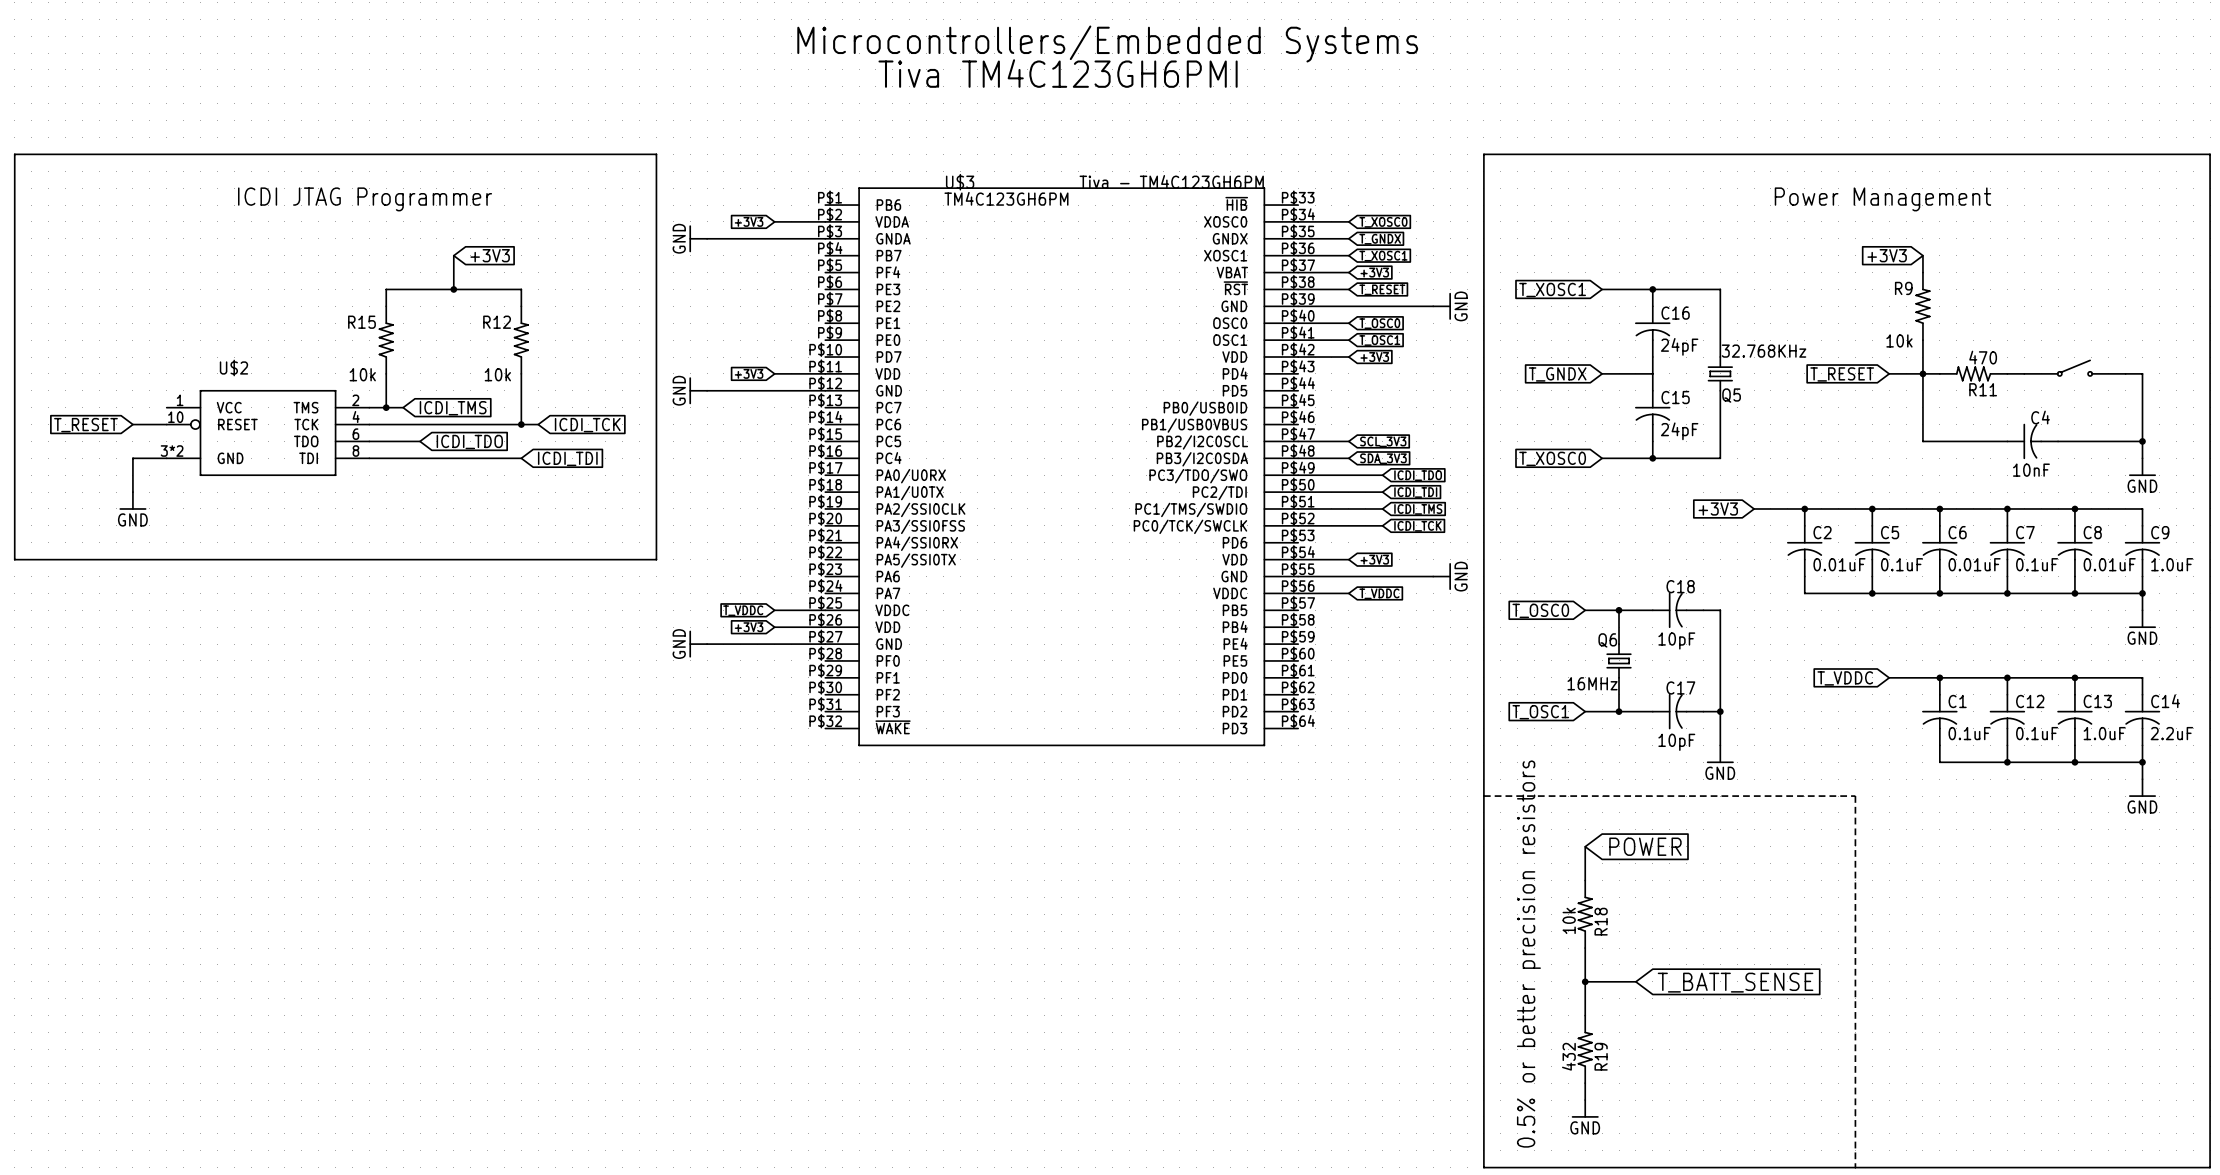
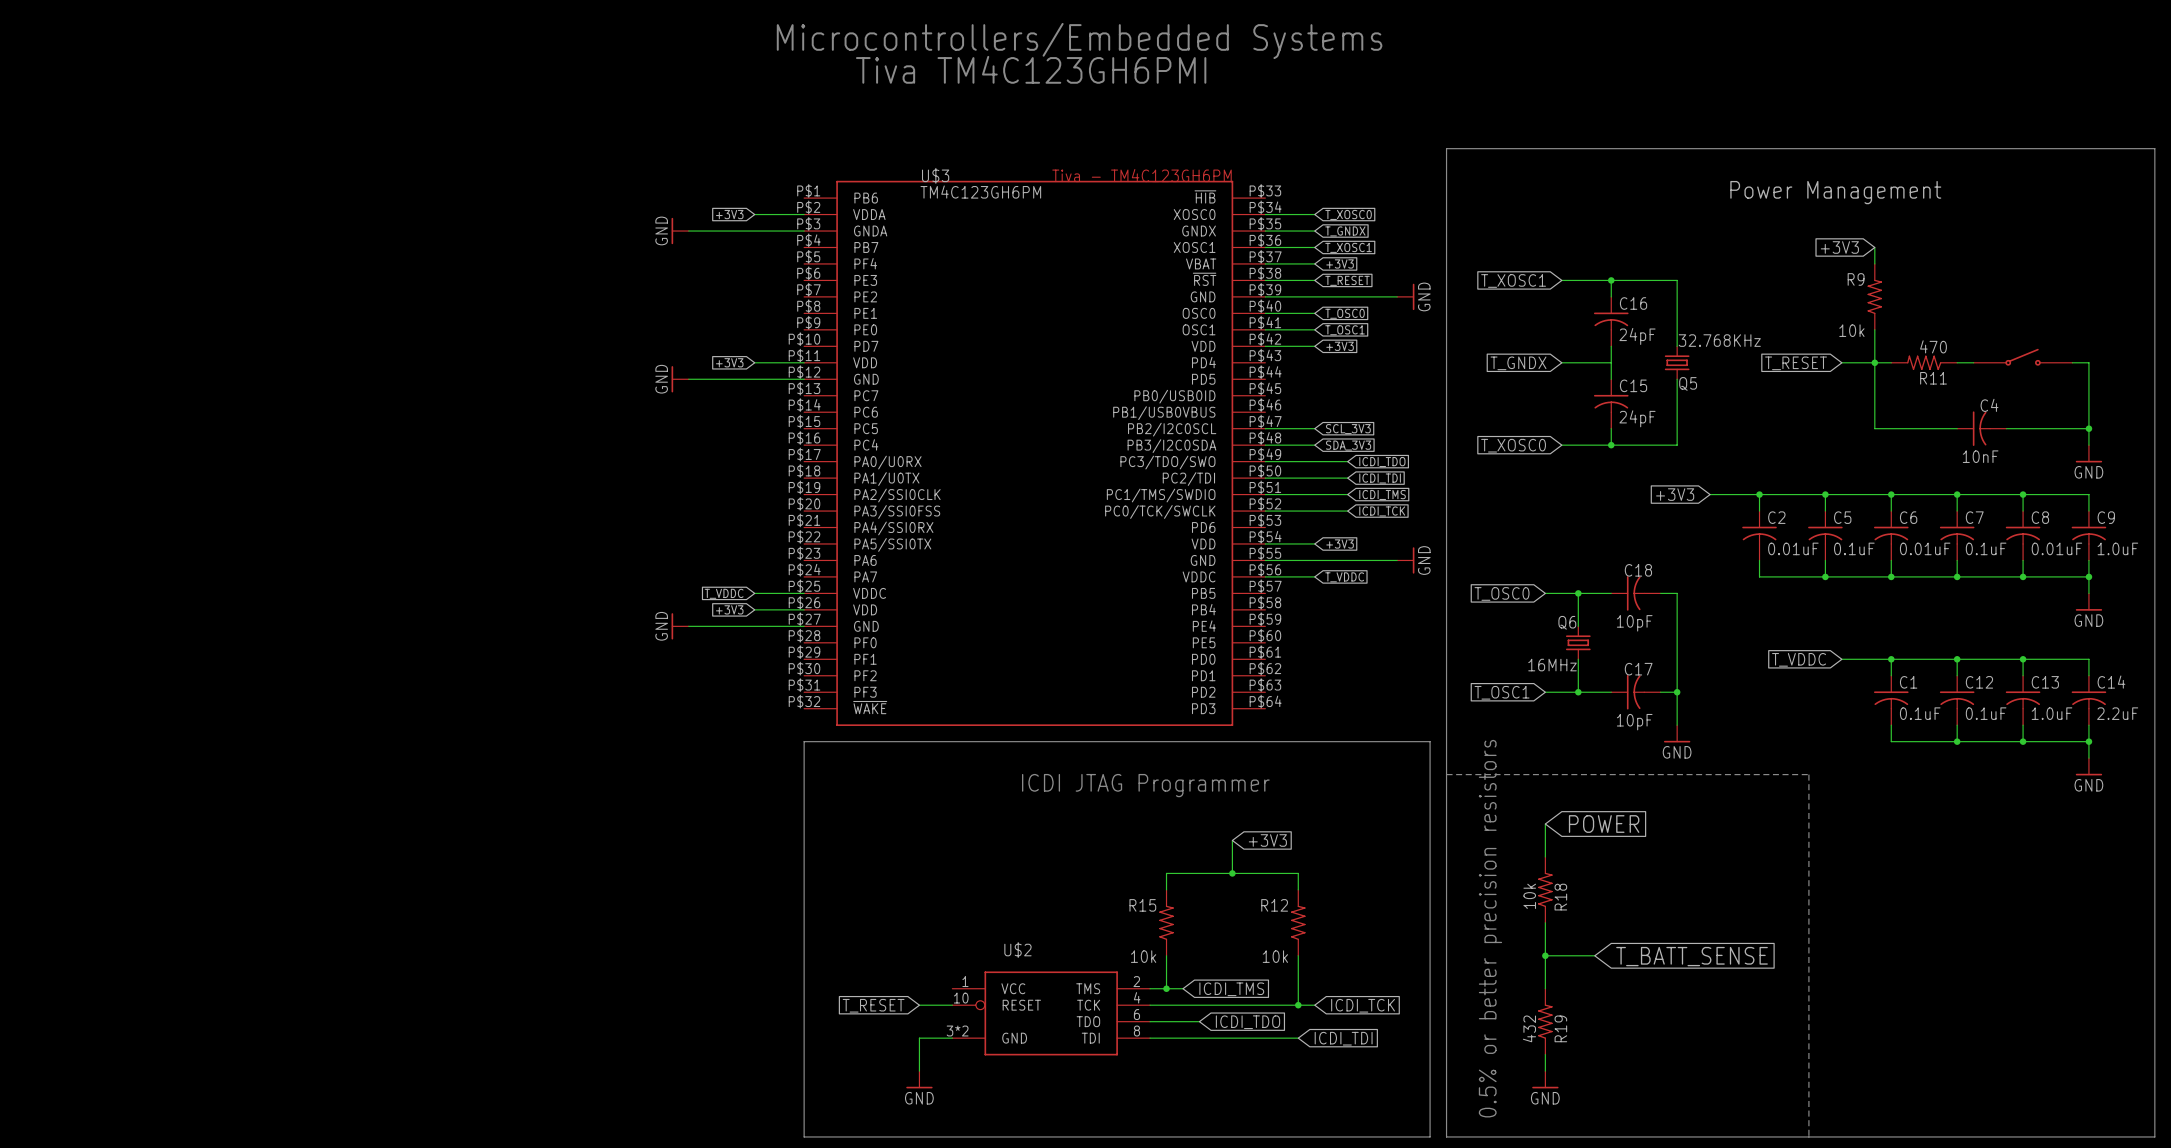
line: (14, 154) (14, 559) (656, 559) (656, 154) (14, 154) -> none
text: ICDI JTAG Programmer (365, 199) -> none
wire: (453, 255) (453, 289) -> none
global label: +3V3 (490, 255) -> none
junction: (453, 289) -> none
wire: (386, 306) (386, 289) (521, 289) (521, 306) -> none
R15 position: (386, 340) -> (1166, 922)
R12 position: (521, 340) -> (1298, 922)
wire: (386, 373) (386, 407) -> none
wire: (521, 373) (521, 424) -> none
wire: (369, 407) (403, 407) -> none
junction: (386, 407) -> none
global label: ICDI_TMS (453, 408) -> none
wire: (132, 424) (166, 424) -> none
wire: (369, 424) (538, 424) -> none
junction: (521, 424) -> none
global label: T_RESET (85, 425) -> none
global label: ICDI_TCK (587, 425) -> none
U$2 position: (268, 433) -> (1051, 1013)
wire: (369, 441) (420, 441) -> none
global label: ICDI_TDO (469, 442) -> none
wire: (166, 458) (132, 458) (132, 492) -> none
wire: (369, 458) (521, 458) -> none
global label: ICDI_TDI (567, 458) -> none
power symbol: GND (132, 500) -> none
line: none -> (804, 741) (804, 1136) (1430, 1136) (1430, 741) (804, 741)
text: none -> ICDI JTAG Programmer (1145, 785)
wire: none -> (1232, 840) (1232, 873)
global label: none -> +3V3 (1267, 840)
junction: none -> (1232, 873)
wire: none -> (1166, 889) (1166, 873) (1298, 873) (1298, 889)
wire: none -> (1166, 955) (1166, 988)
wire: none -> (1298, 955) (1298, 1005)
wire: none -> (1150, 988) (1182, 988)
junction: none -> (1166, 988)
global label: none -> ICDI_TMS (1231, 989)
wire: none -> (919, 1005) (952, 1005)
wire: none -> (1150, 1005) (1314, 1005)
junction: none -> (1298, 1005)
global label: none -> T_RESET (873, 1005)
global label: none -> ICDI_TCK (1363, 1005)
wire: none -> (1150, 1021) (1199, 1021)
global label: none -> ICDI_TDO (1248, 1022)
wire: none -> (952, 1038) (919, 1038) (919, 1071)
wire: none -> (1150, 1038) (1298, 1038)
global label: none -> ICDI_TDI (1343, 1038)
power symbol: none -> GND (919, 1079)

